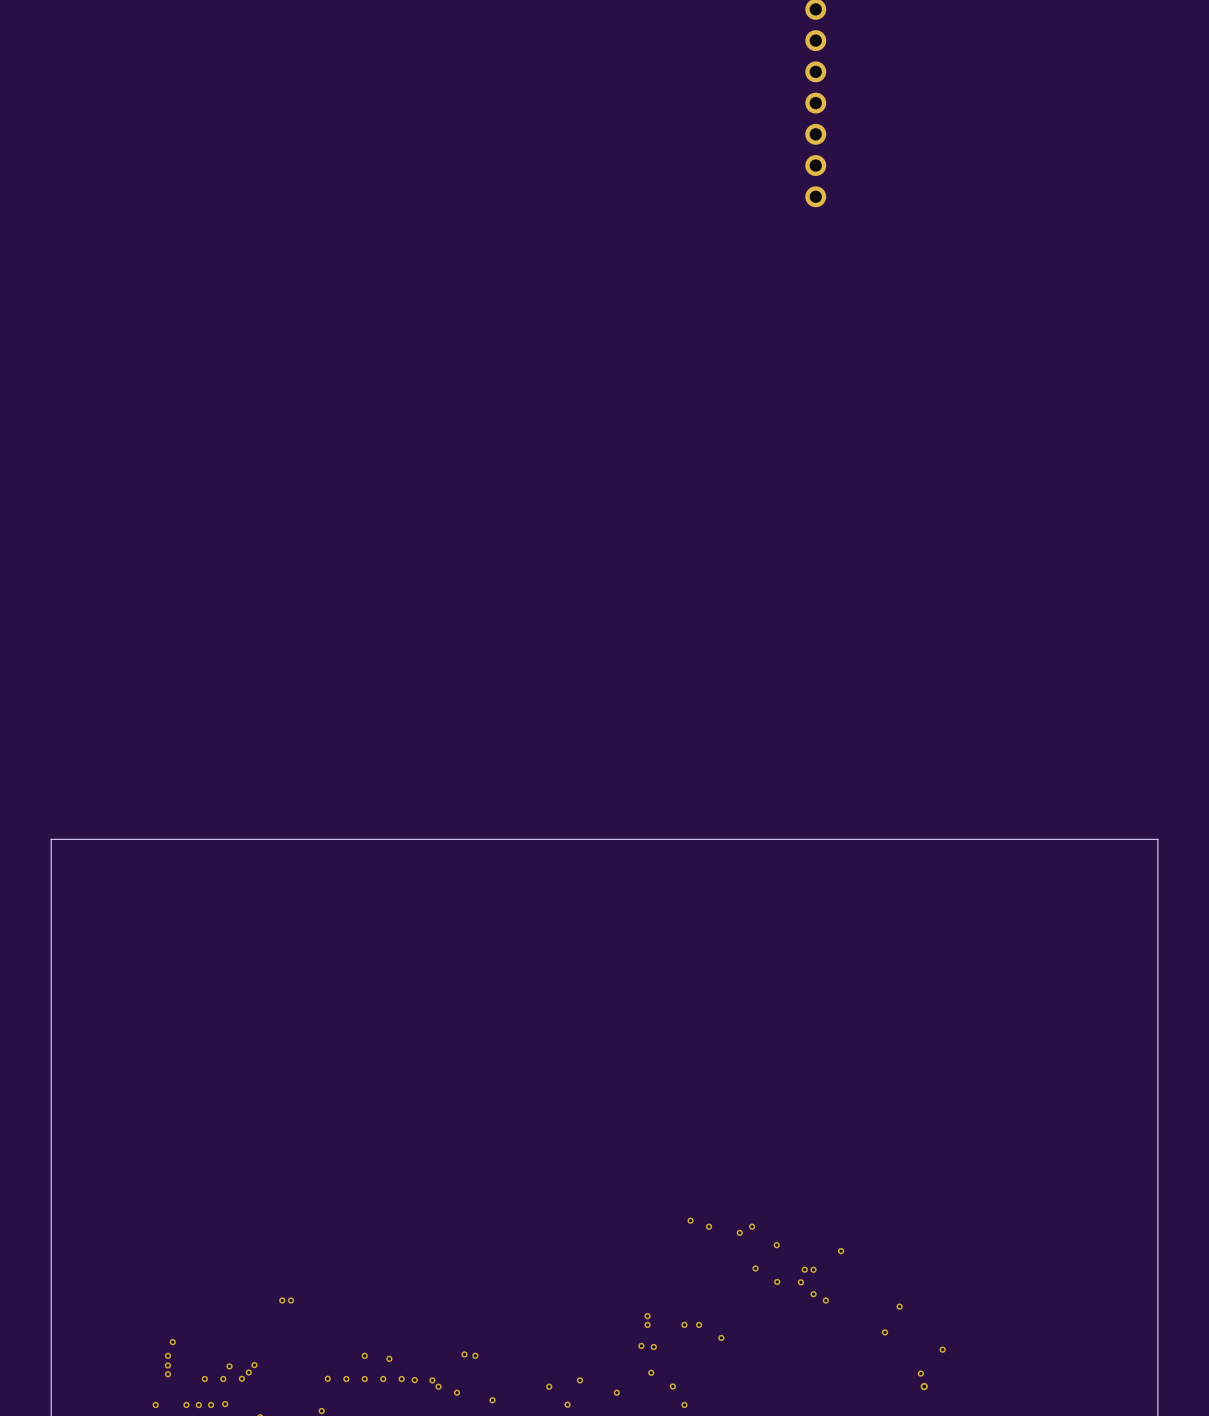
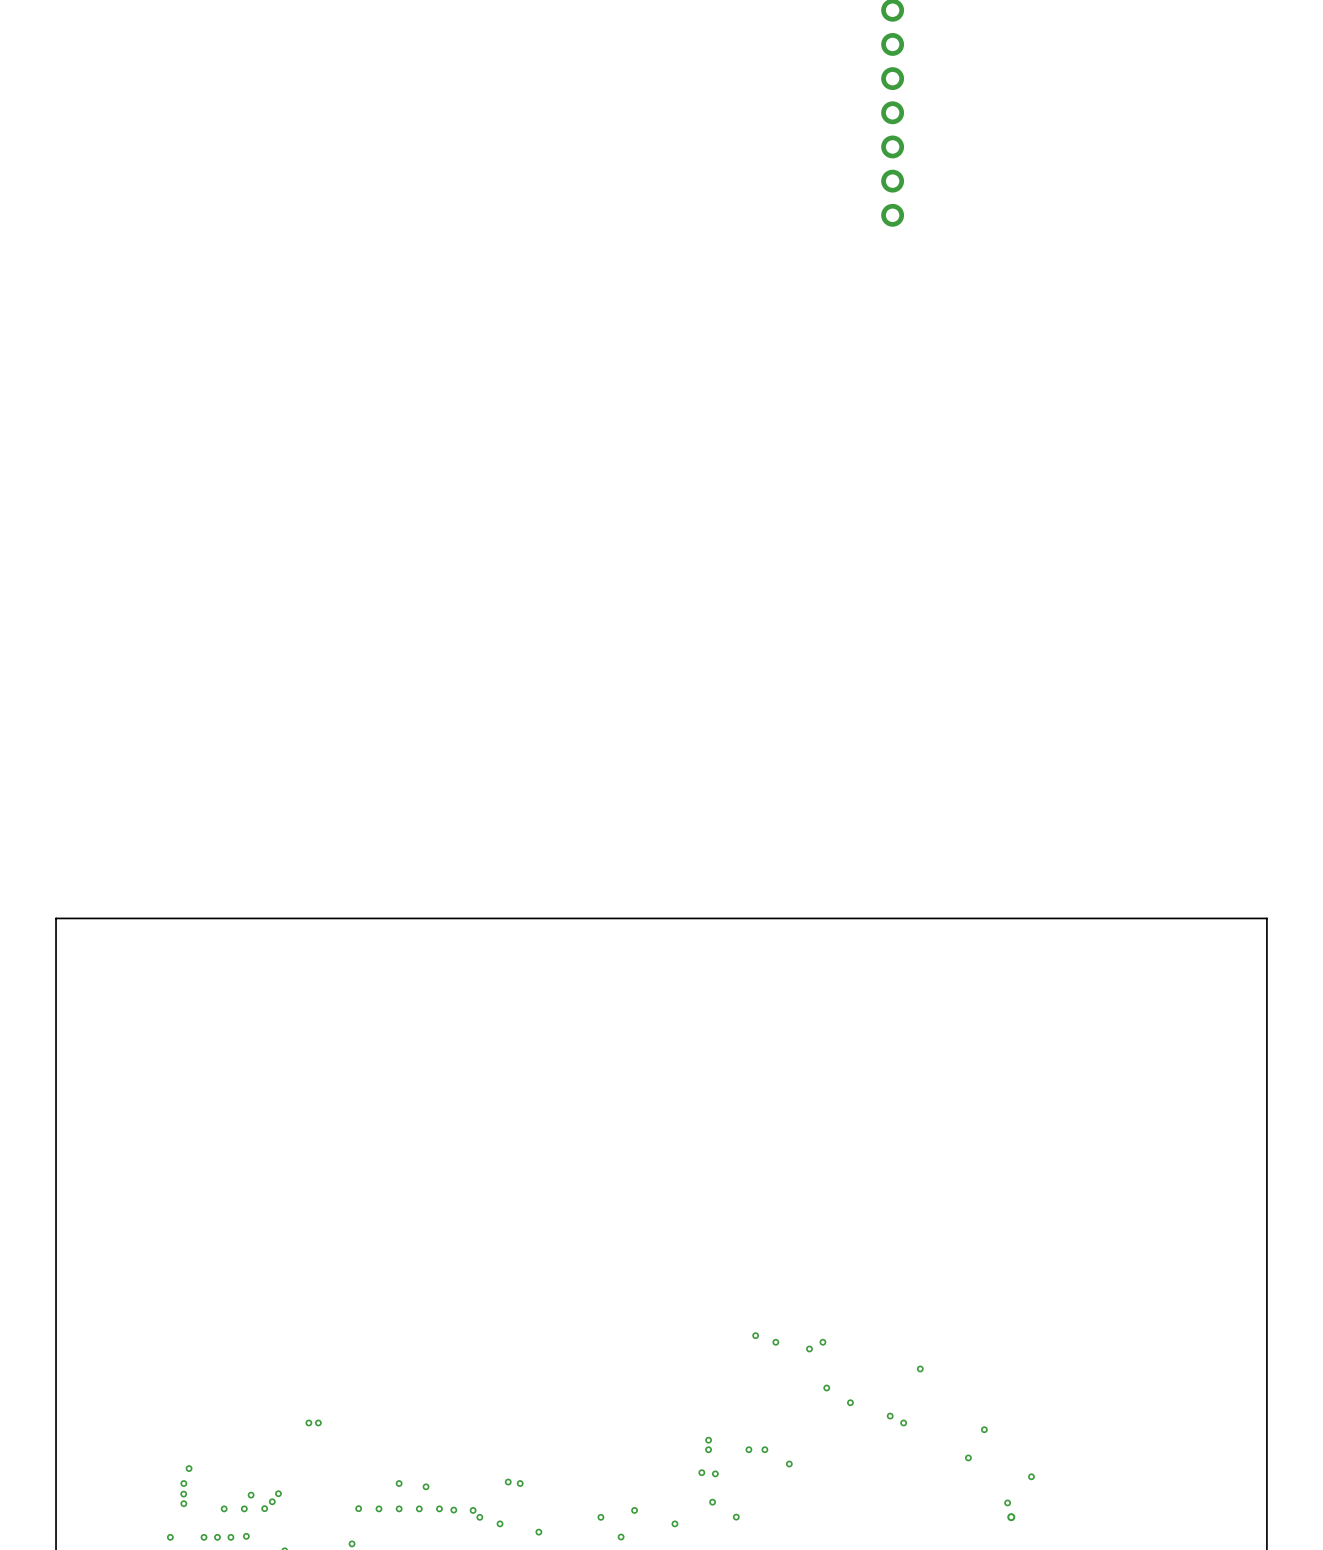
via: (776, 1245) -> none
via: (804, 1269) -> none
via: (813, 1269) -> none
via: (800, 1282) -> none
via: (684, 1405) -> none

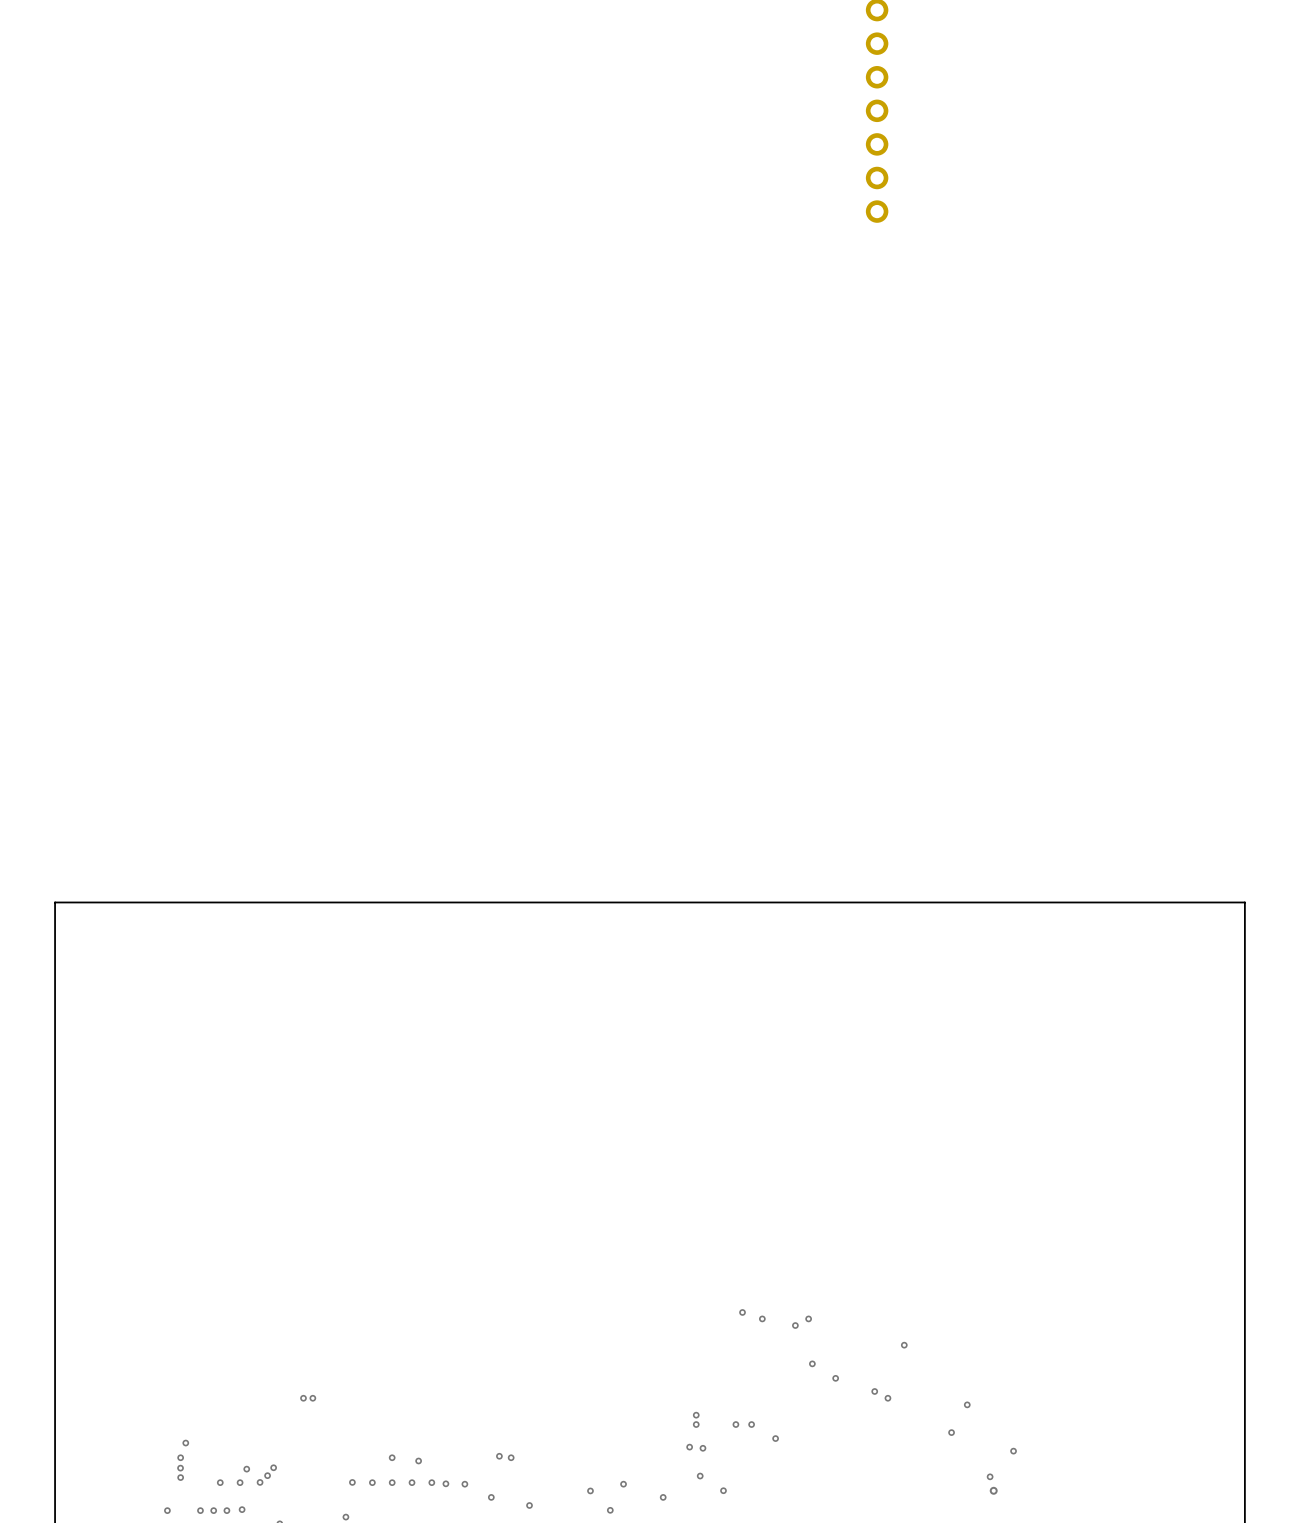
via: (479, 1517) -> none

